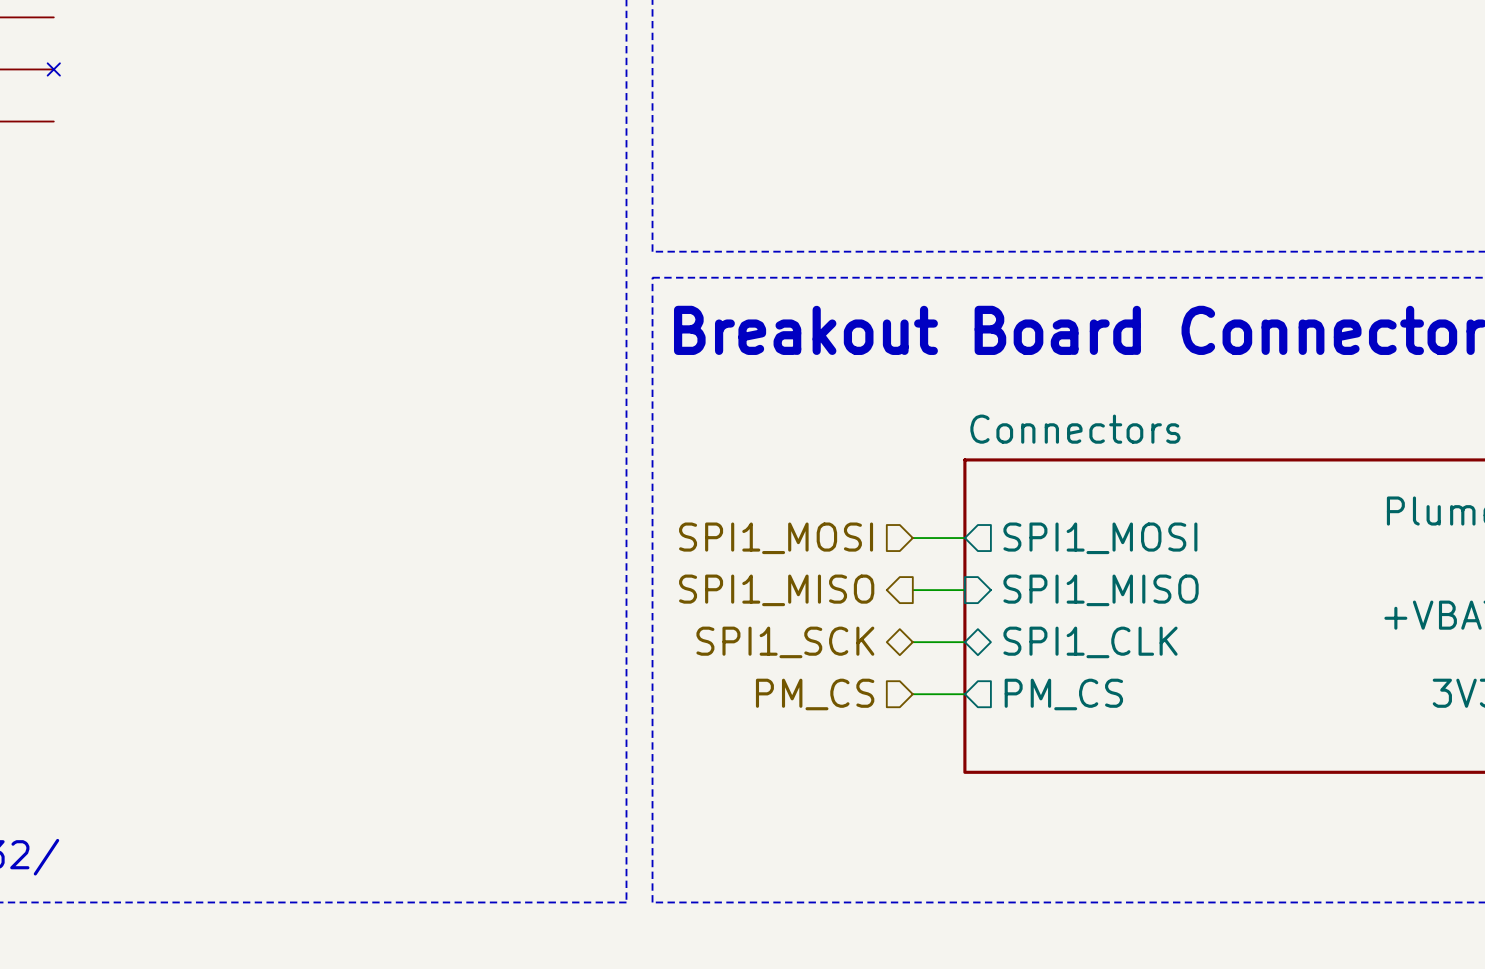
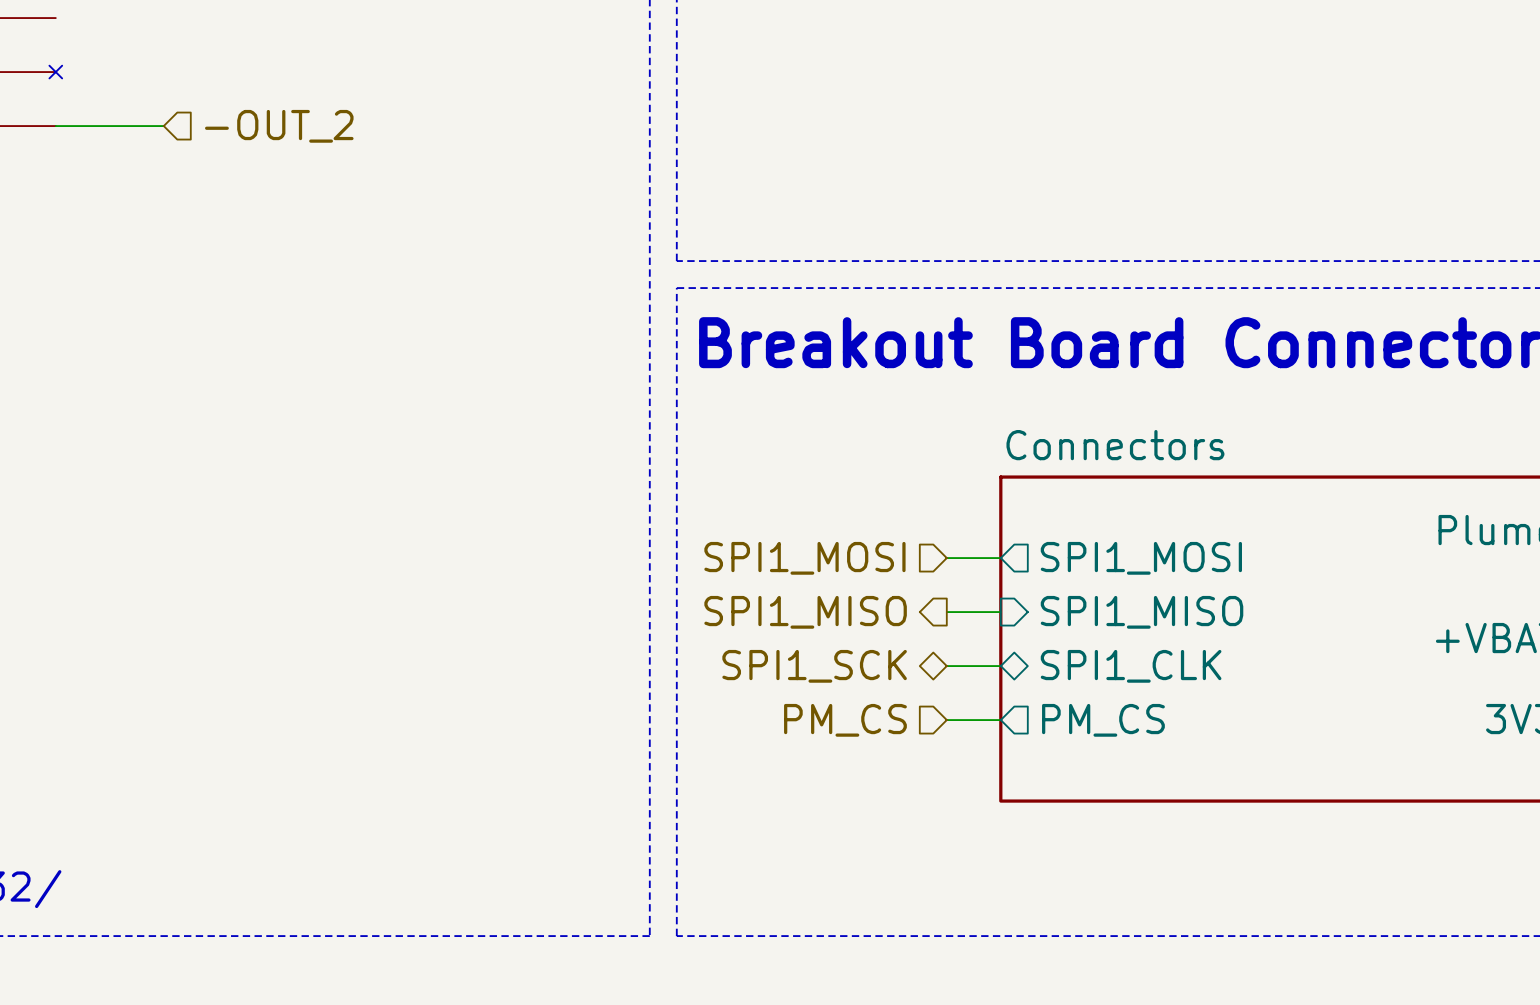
wire: none -> (55, 126) (163, 126)
hierarchical label: none -> -OUT_2 (279, 126)

